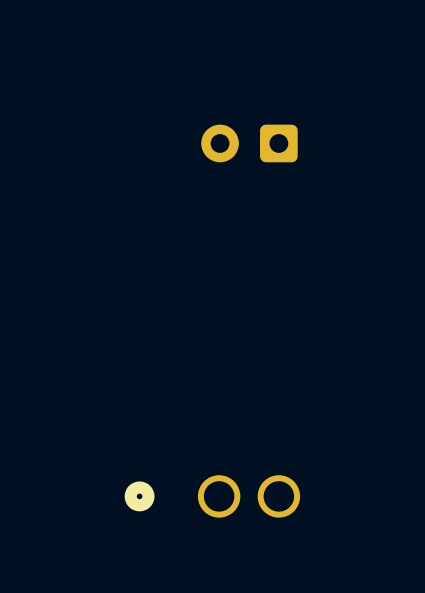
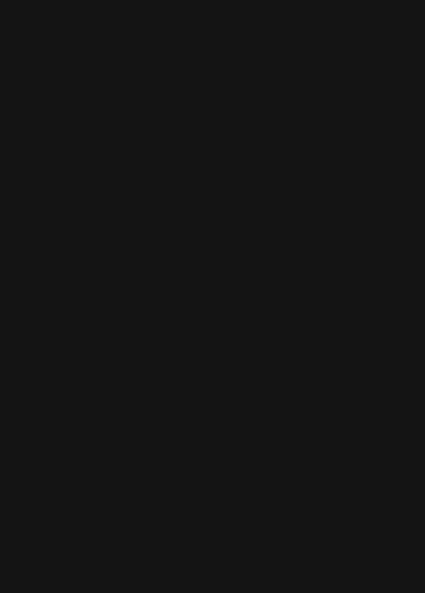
part: (249, 143) -> none
part: (212, 496) -> none

